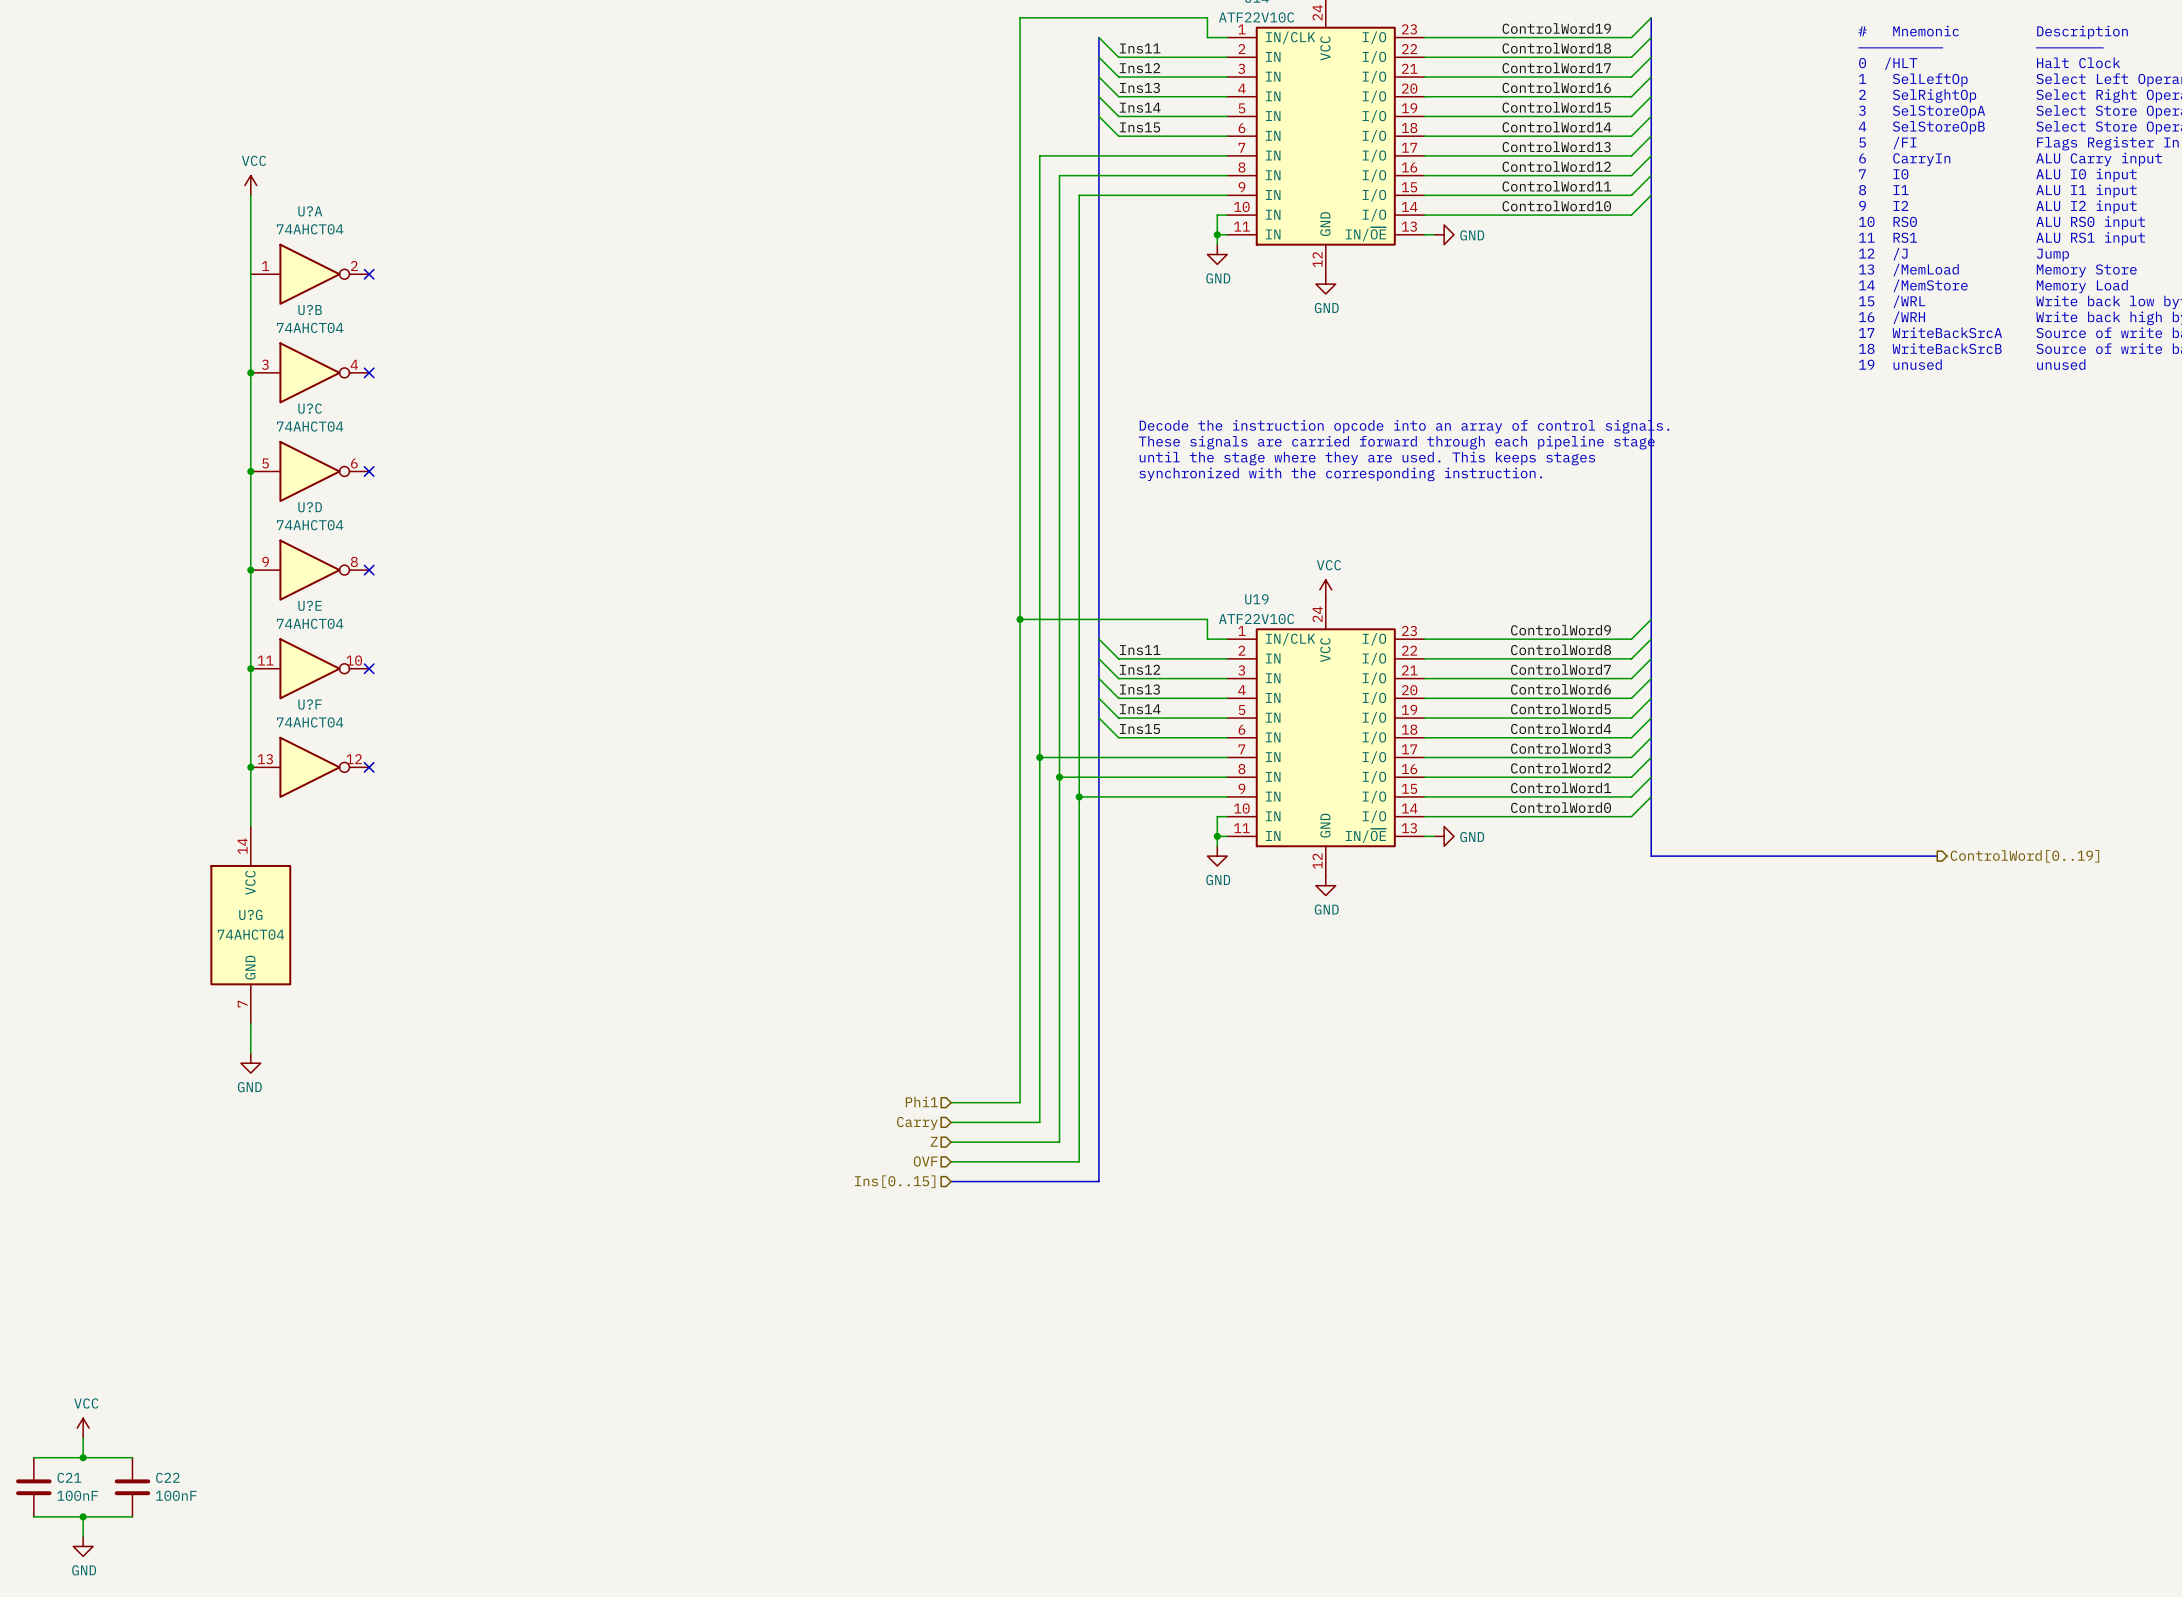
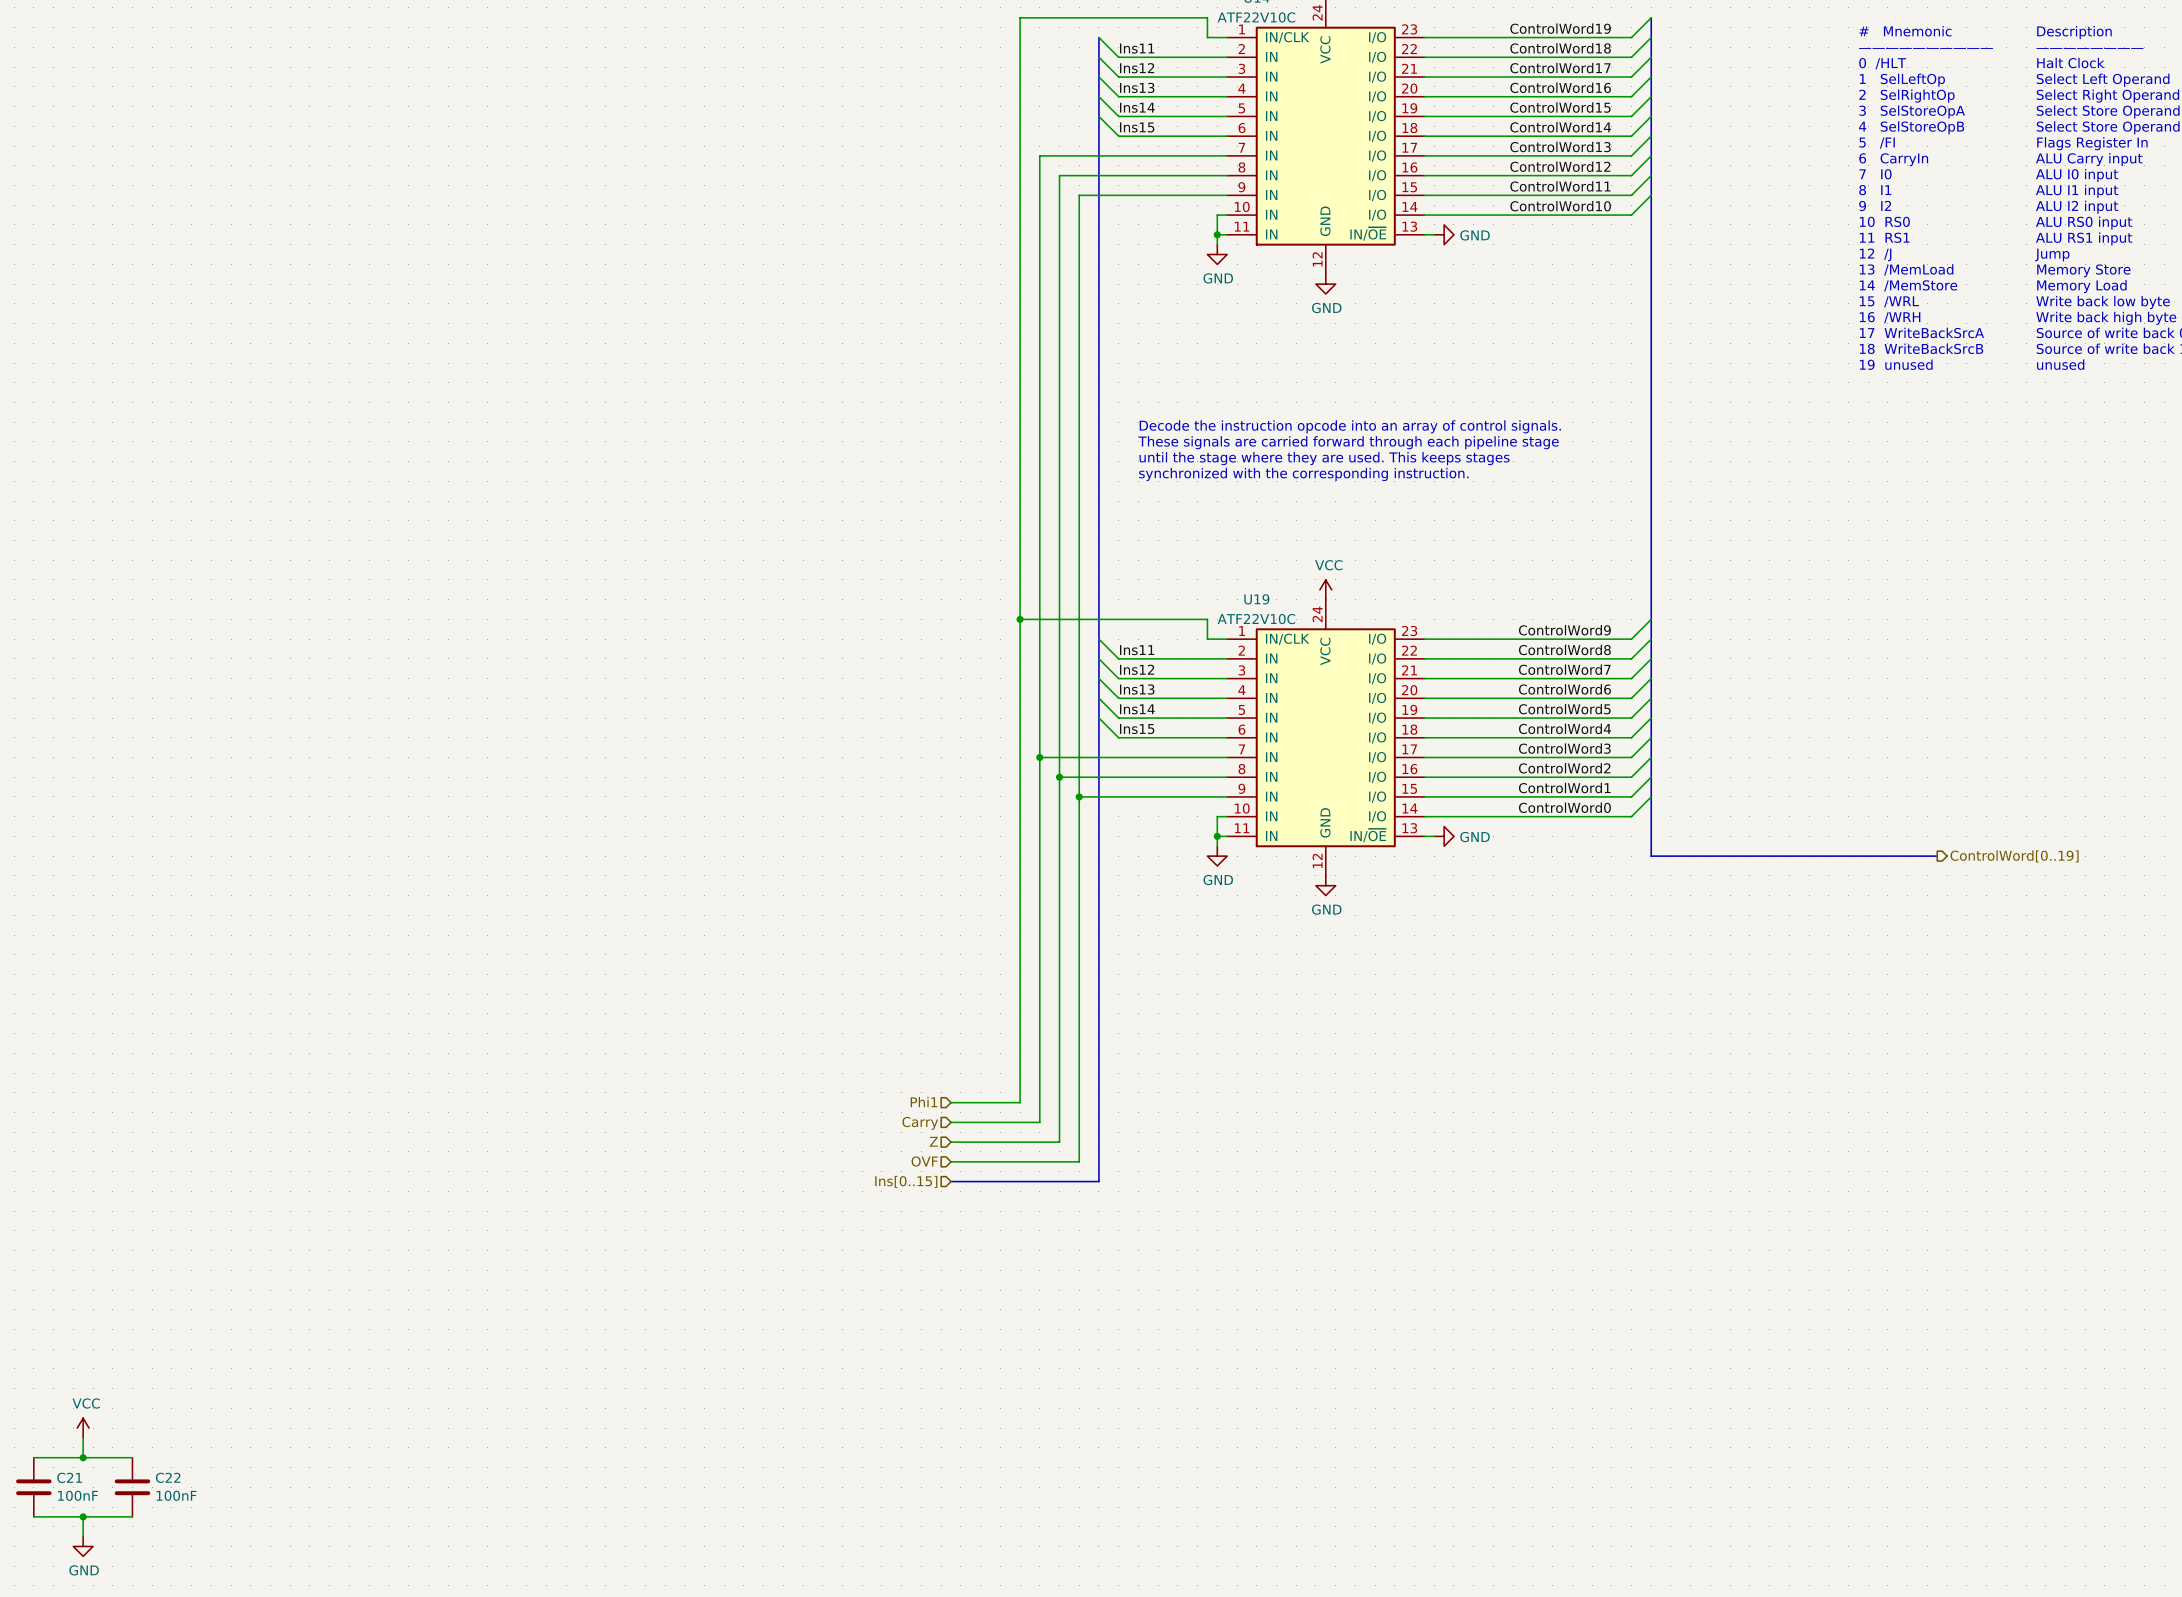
power symbol: VCC (250, 185) -> none
wire: (250, 195) (250, 826) -> none
U?A: 74AHCT04 (309, 274) -> none
no-connect mark: (369, 274) -> none
junction: (250, 372) -> none
U?B: 74AHCT04 (309, 372) -> none
no-connect mark: (369, 372) -> none
junction: (250, 471) -> none
U?C: 74AHCT04 (309, 471) -> none
no-connect mark: (369, 471) -> none
junction: (250, 570) -> none
U?D: 74AHCT04 (309, 570) -> none
no-connect mark: (369, 570) -> none
junction: (250, 668) -> none
U?E: 74AHCT04 (309, 668) -> none
no-connect mark: (369, 668) -> none
junction: (250, 767) -> none
U?F: 74AHCT04 (309, 767) -> none
no-connect mark: (369, 767) -> none
U?G: 74AHCT04 (250, 925) -> none
wire: (250, 1023) (250, 1053) -> none
power symbol: GND (250, 1063) -> none

